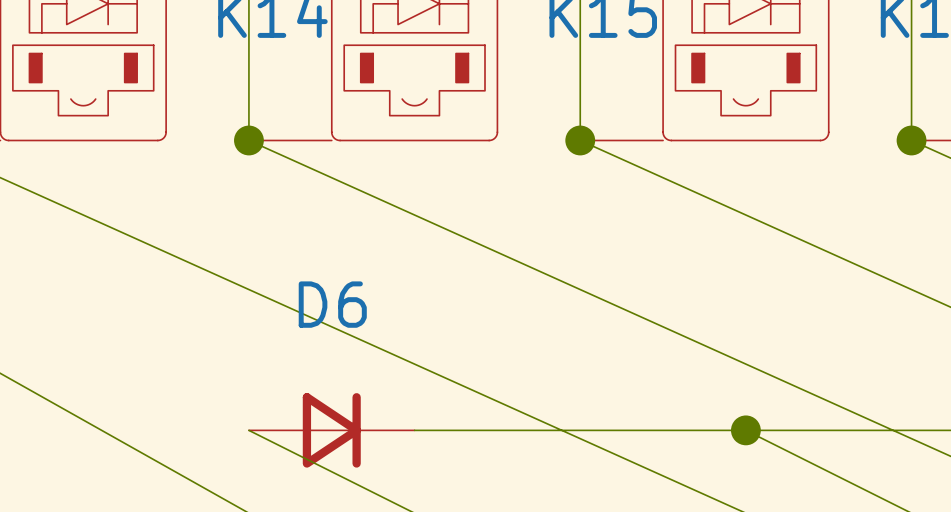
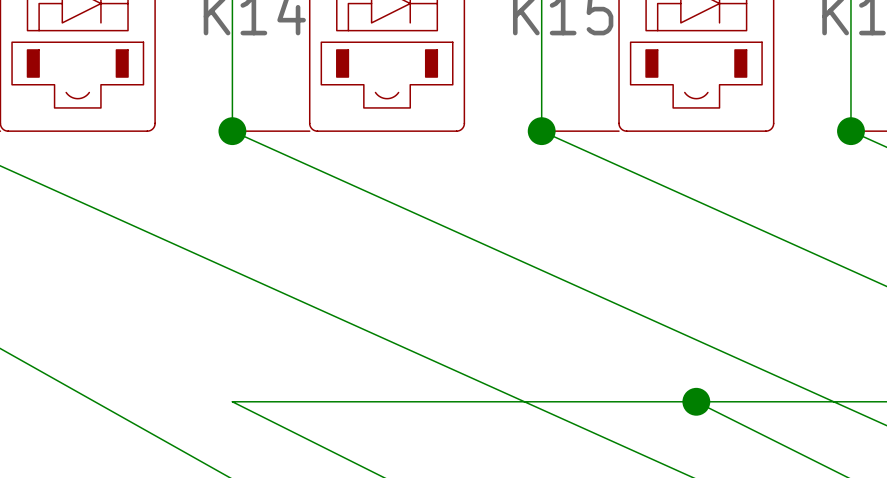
D6: (331, 430) -> none

